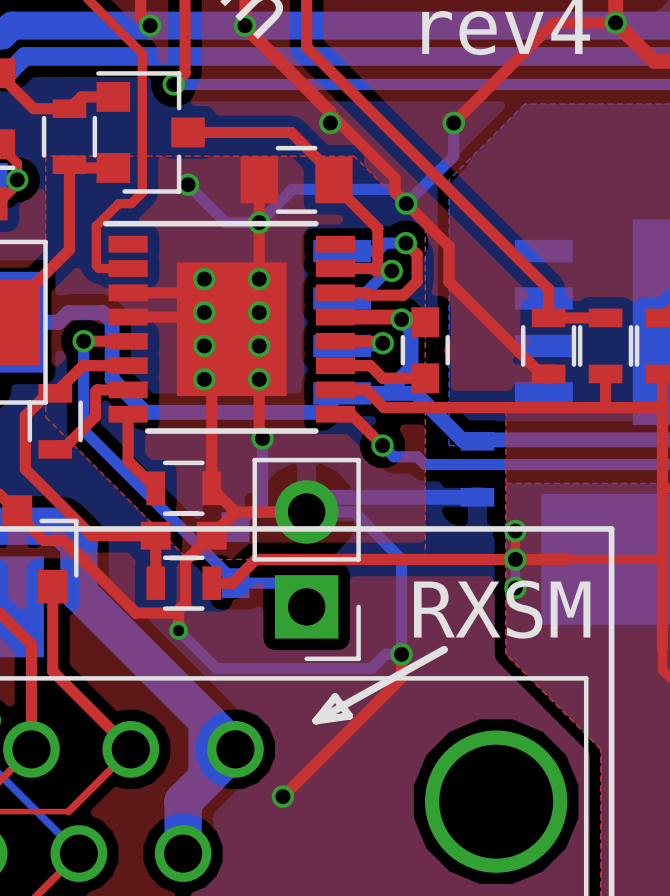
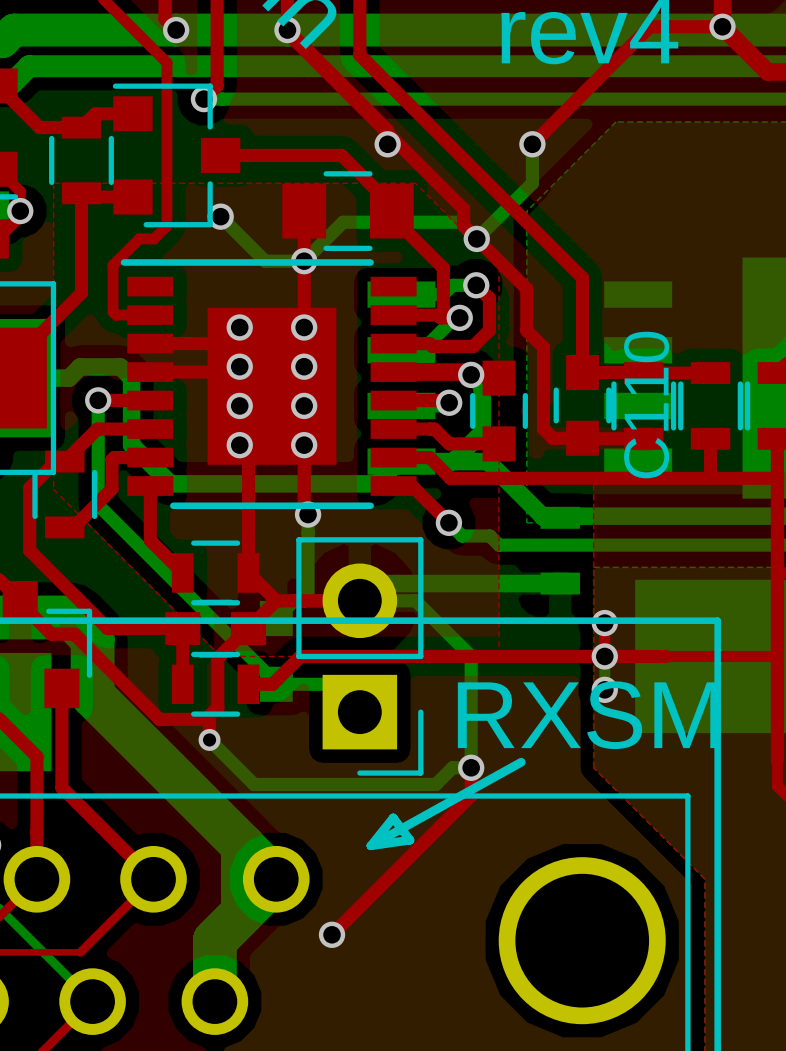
top track: (496, 236) (548, 289) (548, 317) -> (582, 277) (582, 372) (643, 372)
top track: (463, 296) (541, 373) -> (543, 347) (543, 428) (552, 438) (582, 438)
C110: none -> (582, 405)
top track: none -> (583, 438) (634, 438)

